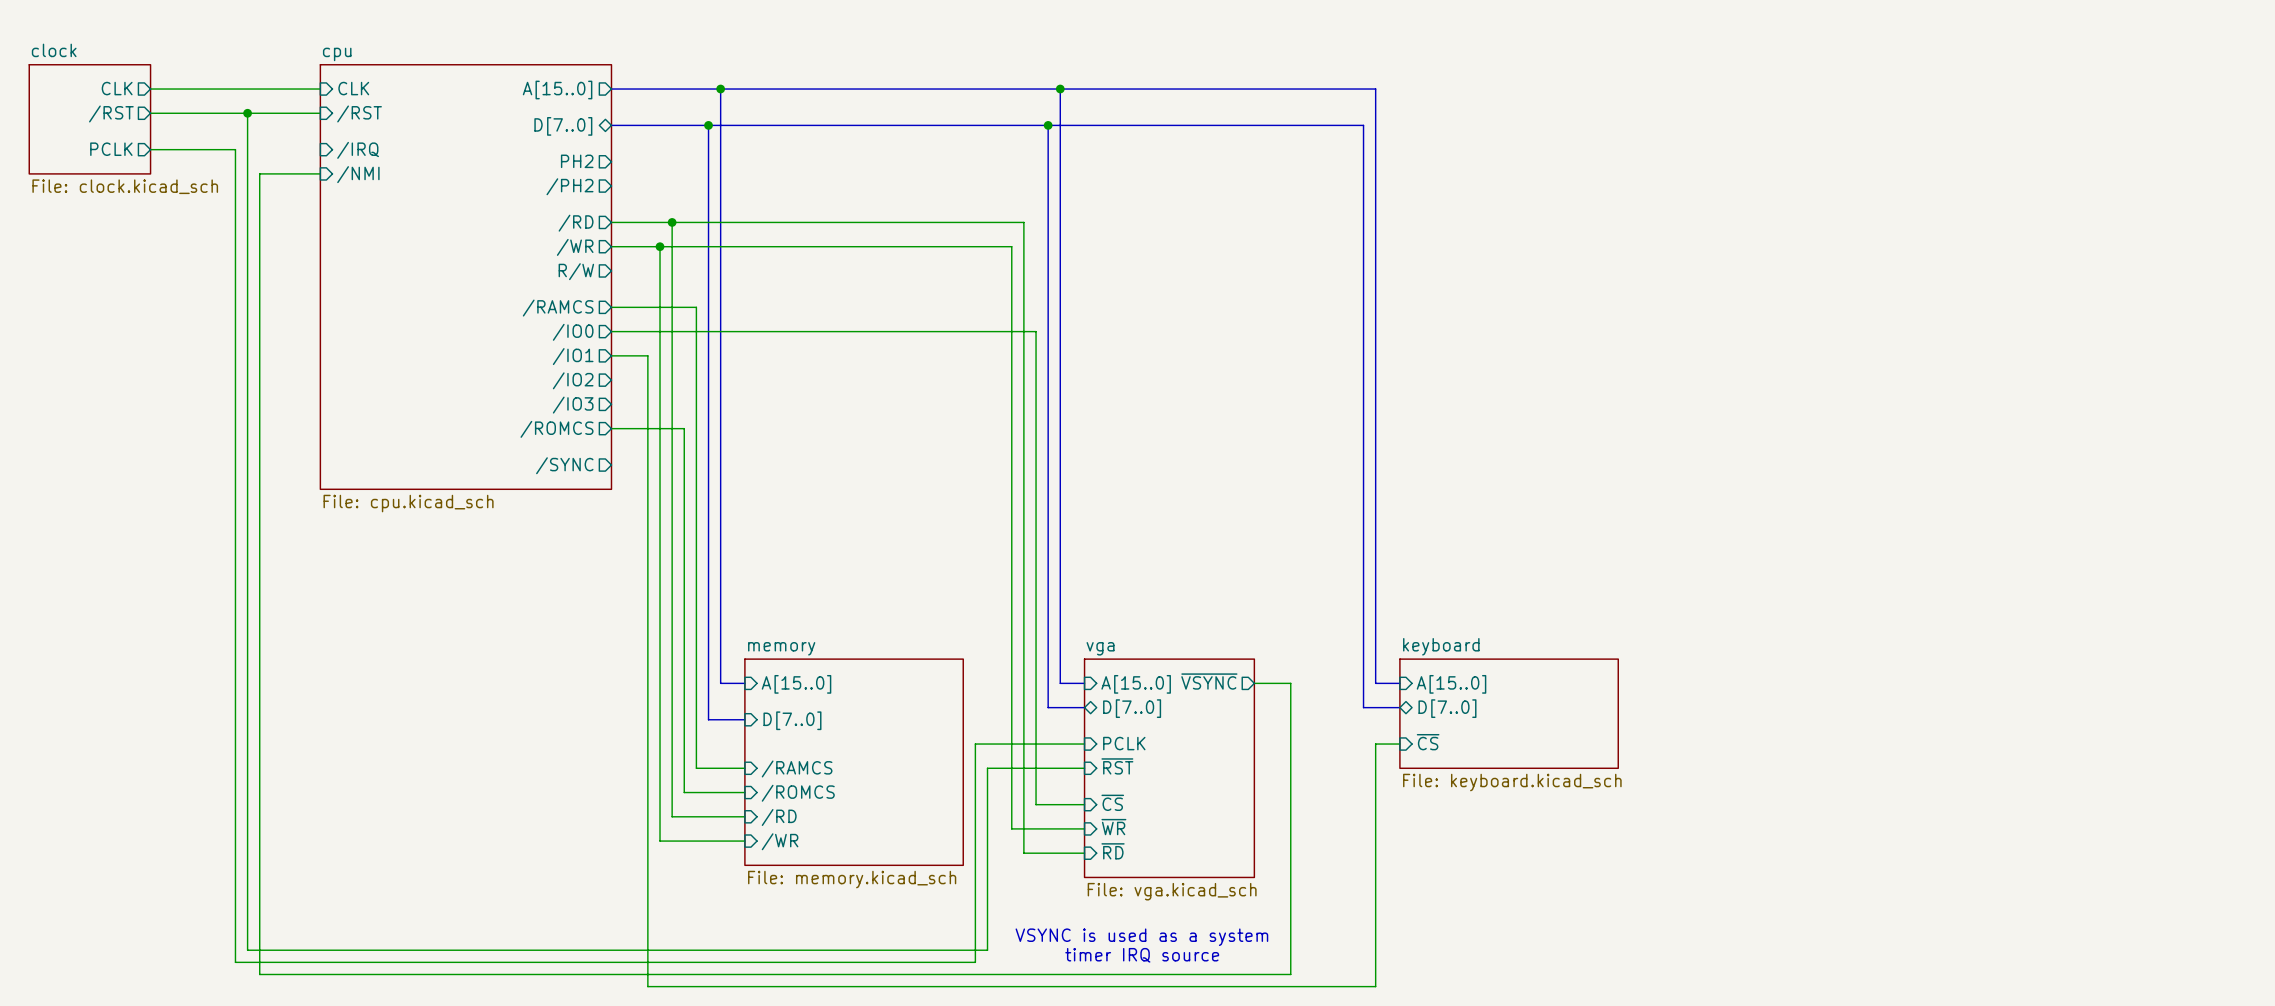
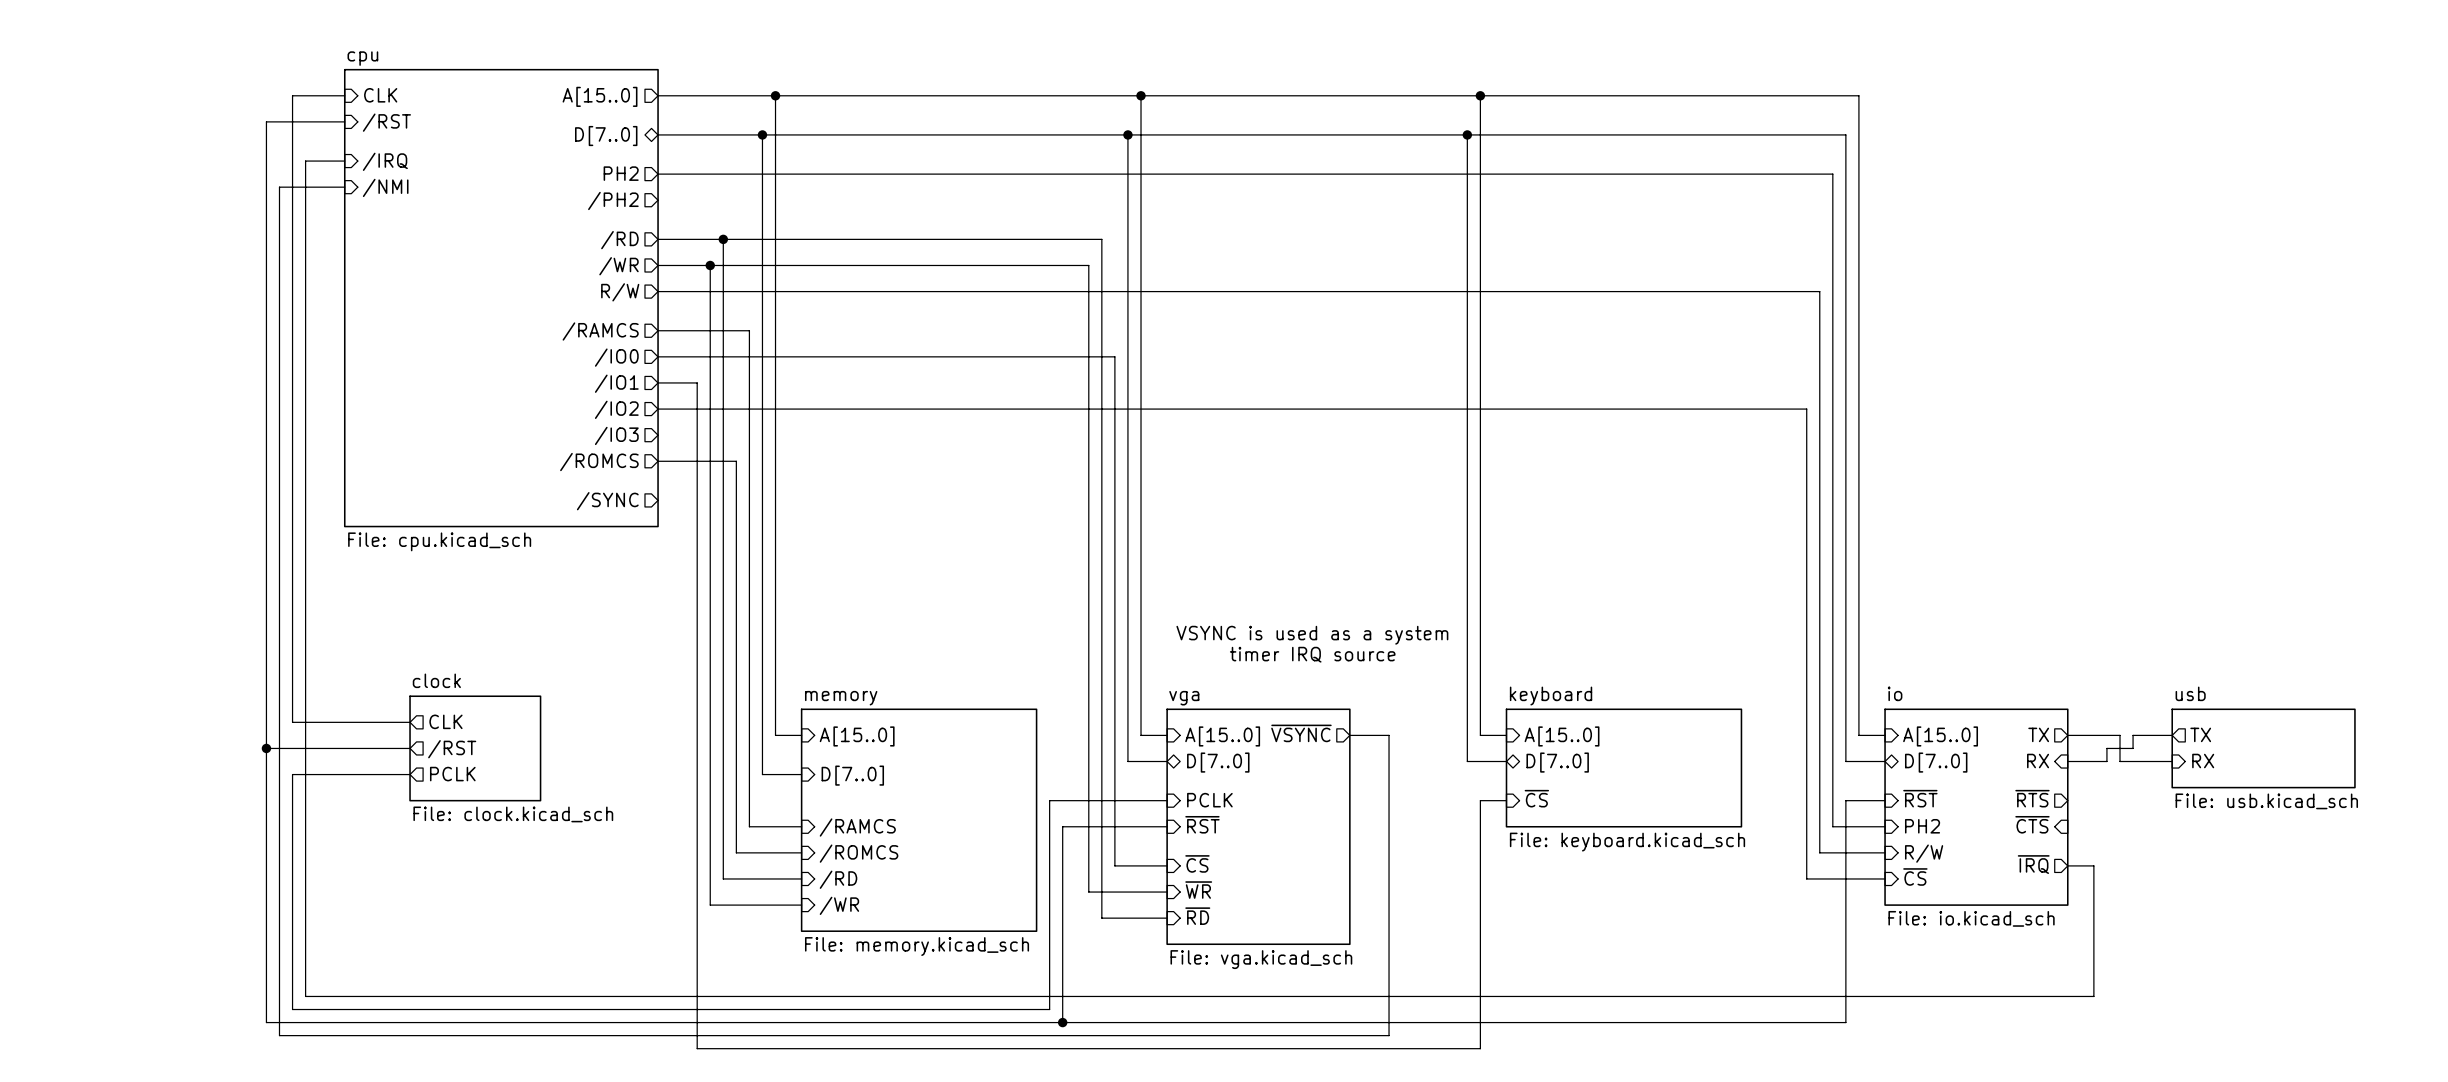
sheet pin: CLK (117, 88) -> none
wire: (150, 89) (271, 89) -> (410, 722) (292, 722) (292, 95)
bus: none -> (1480, 95) (1858, 95) (1858, 735) (1885, 735)
junction: none -> (1480, 95)
sheet pin: /RST (111, 113) -> none
wire: (150, 113) (247, 113) -> none
junction: (247, 113) -> none
sheet clock: File: clock.kicad_sch (89, 119) -> none
bus: none -> (1467, 134) (1845, 134) (1845, 761) (1885, 761)
junction: none -> (1467, 134)
sheet pin: PCLK (111, 149) -> none
wire: (150, 149) (235, 149) (235, 962) (259, 962) (259, 974) (647, 974) (647, 986) (1375, 986) (1375, 974) -> none
wire: none -> (344, 161) (305, 161) (305, 996) (2093, 996) (2093, 865) (2067, 865)
wire: none -> (658, 174) (1832, 174) (1832, 826) (1885, 826)
wire: none -> (658, 291) (1819, 291) (1819, 852) (1885, 852)
wire: none -> (658, 409) (1806, 409) (1806, 878) (1885, 878)
text: none -> VSYNC is used as a system (1312, 635)
text: none -> timer IRQ source (1312, 654)
sheet pin: none -> CLK (445, 721)
sheet pin: none -> TX (2038, 734)
sheet pin: none -> TX (2200, 734)
wire: none -> (2067, 735) (2120, 735) (2120, 761) (2172, 761)
wire: none -> (2172, 735) (2133, 735) (2133, 748) (2106, 748) (2106, 761) (2067, 761)
sheet pin: none -> A[15..0] (1940, 736)
wire: none -> (266, 748) (410, 748)
junction: none -> (266, 748)
sheet clock: none -> File: clock.kicad_sch (475, 748)
sheet usb: none -> File: usb.kicad_sch (2263, 748)
sheet pin: none -> /RST (452, 749)
sheet pin: none -> RX (2038, 761)
sheet pin: none -> RX (2203, 761)
sheet pin: none -> D[7..0] (1936, 762)
wire: none -> (410, 774) (292, 774) (292, 1009) (1049, 1009)
sheet pin: none -> PCLK (452, 774)
sheet pin: none -> ~{RST} (1920, 798)
sheet pin: none -> ~{RTS} (2032, 798)
wire: none -> (1885, 800) (1845, 800) (1845, 1022) (1062, 1022)
sheet io: none -> File: io.kicad_sch (1976, 807)
sheet pin: none -> ~{CTS} (2032, 824)
sheet pin: none -> PH2 (1922, 826)
sheet pin: none -> R/W (1924, 853)
sheet pin: none -> ~{IRQ} (2033, 864)
sheet pin: none -> ~{CS} (1915, 876)
text: VSYNC is used as a system (1141, 937) -> none
wire: (975, 938) (975, 962) -> (1389, 1035) (1049, 1035)
junction: none -> (1062, 1022)
text: timer IRQ source (1142, 955) -> none
wire: (1290, 962) (1290, 974) -> (1480, 1048) (1389, 1048)

